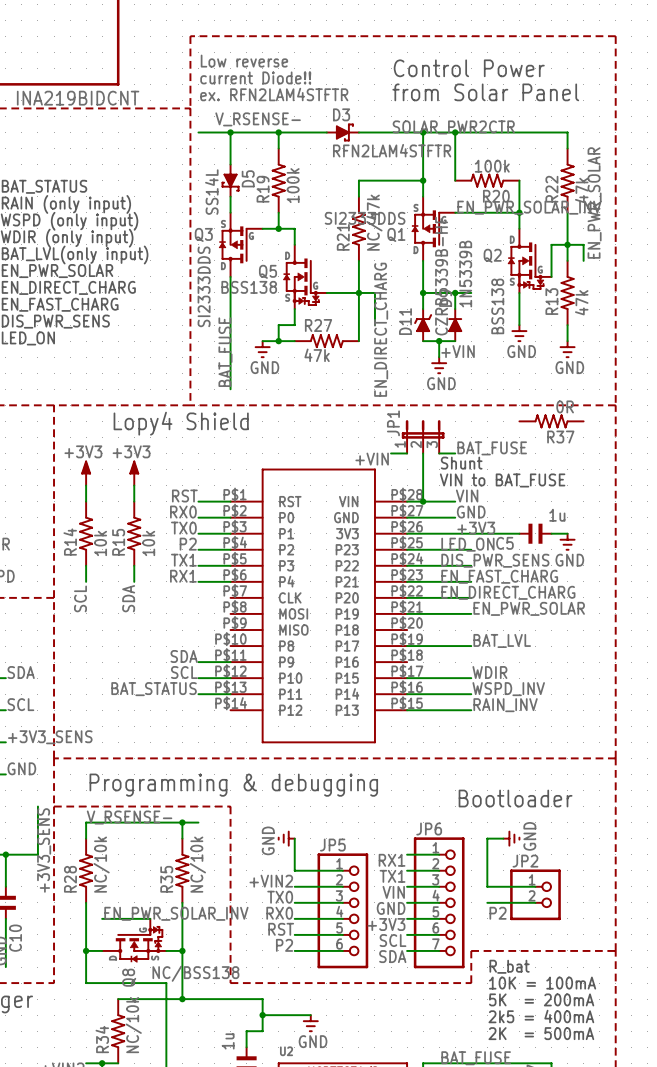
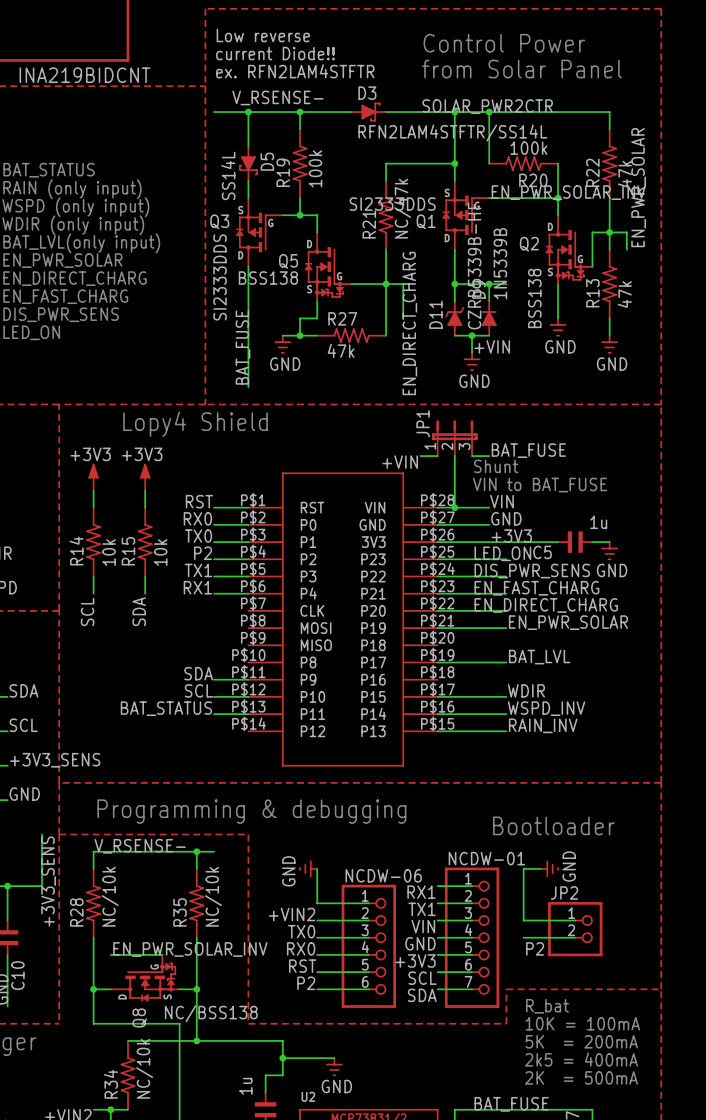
D3 value: RFN2LAM4STFTR (392, 150) -> RFN2LAM4STFTR/SS14L (452, 132)
R37: 0R (551, 421) -> none
JP6 name: JP6 (429, 829) -> NCDW-01 (486, 858)
JP5 name: JP5 (332, 845) -> NCDW-06 (383, 875)

